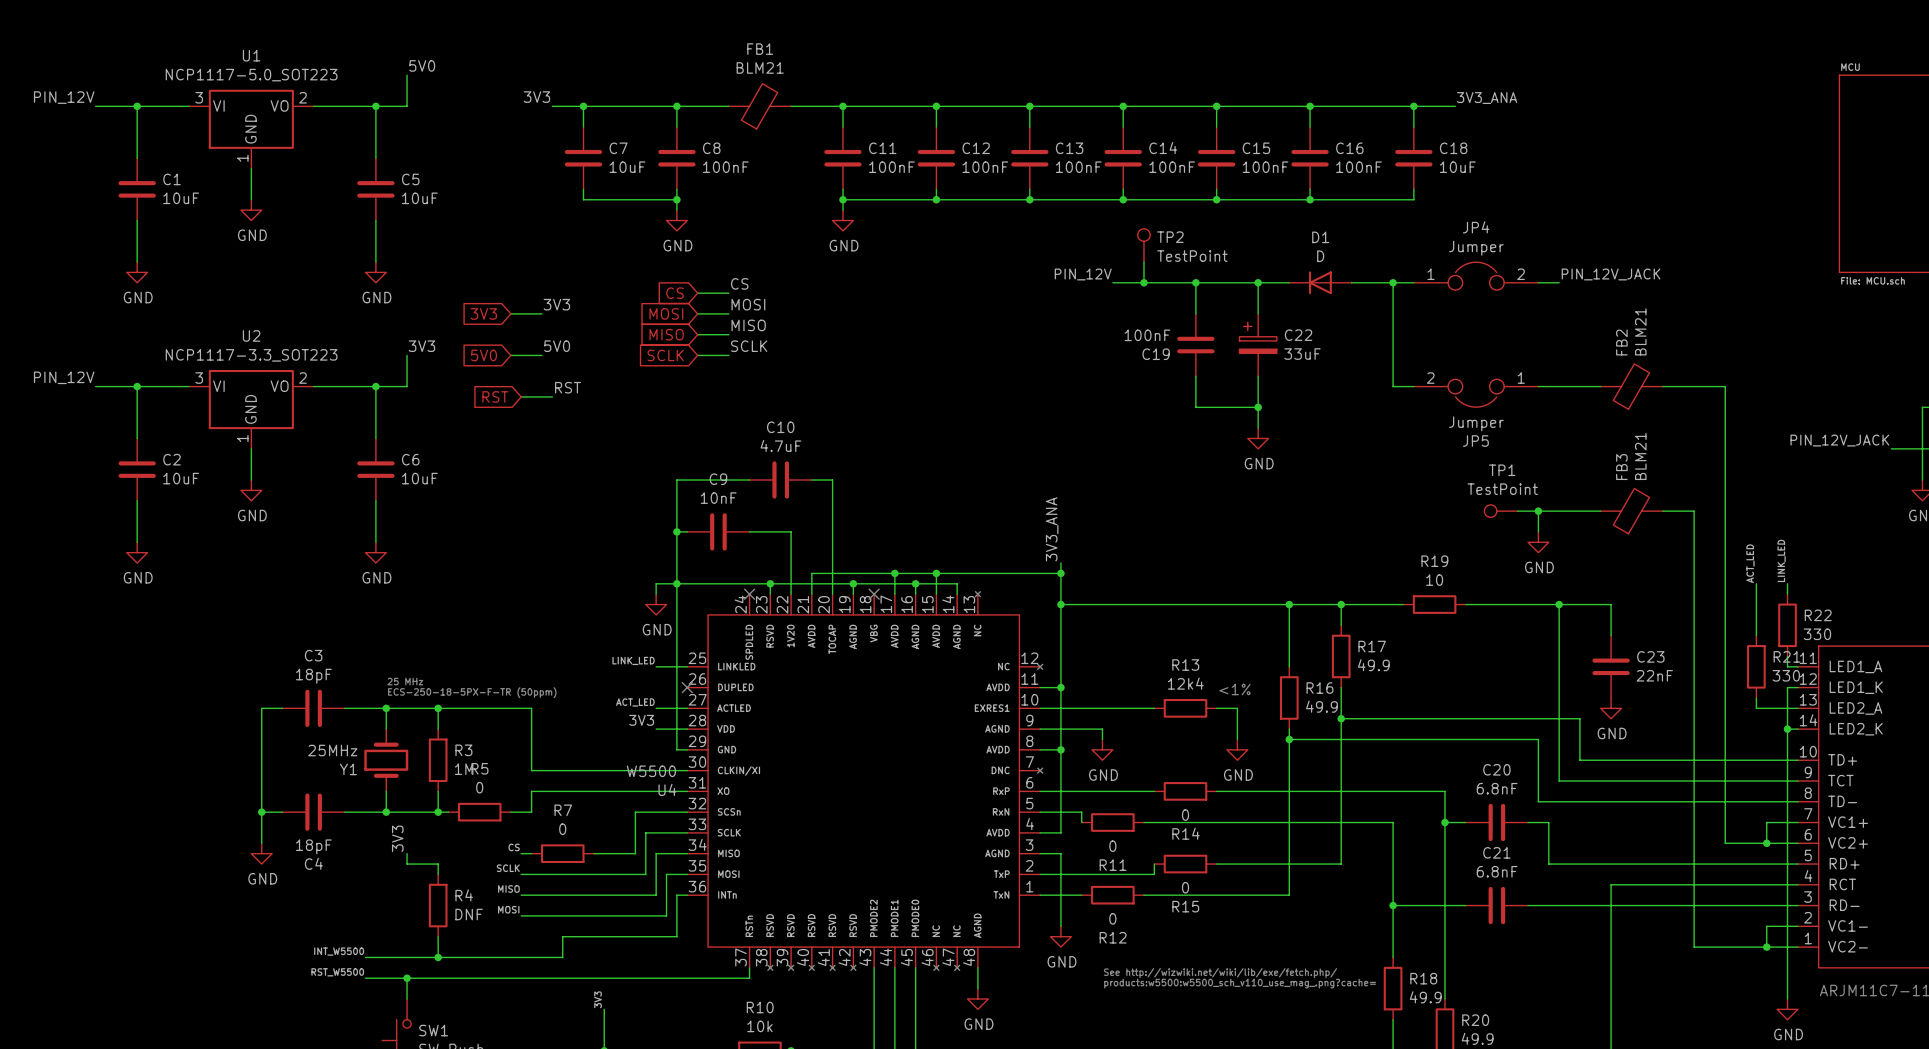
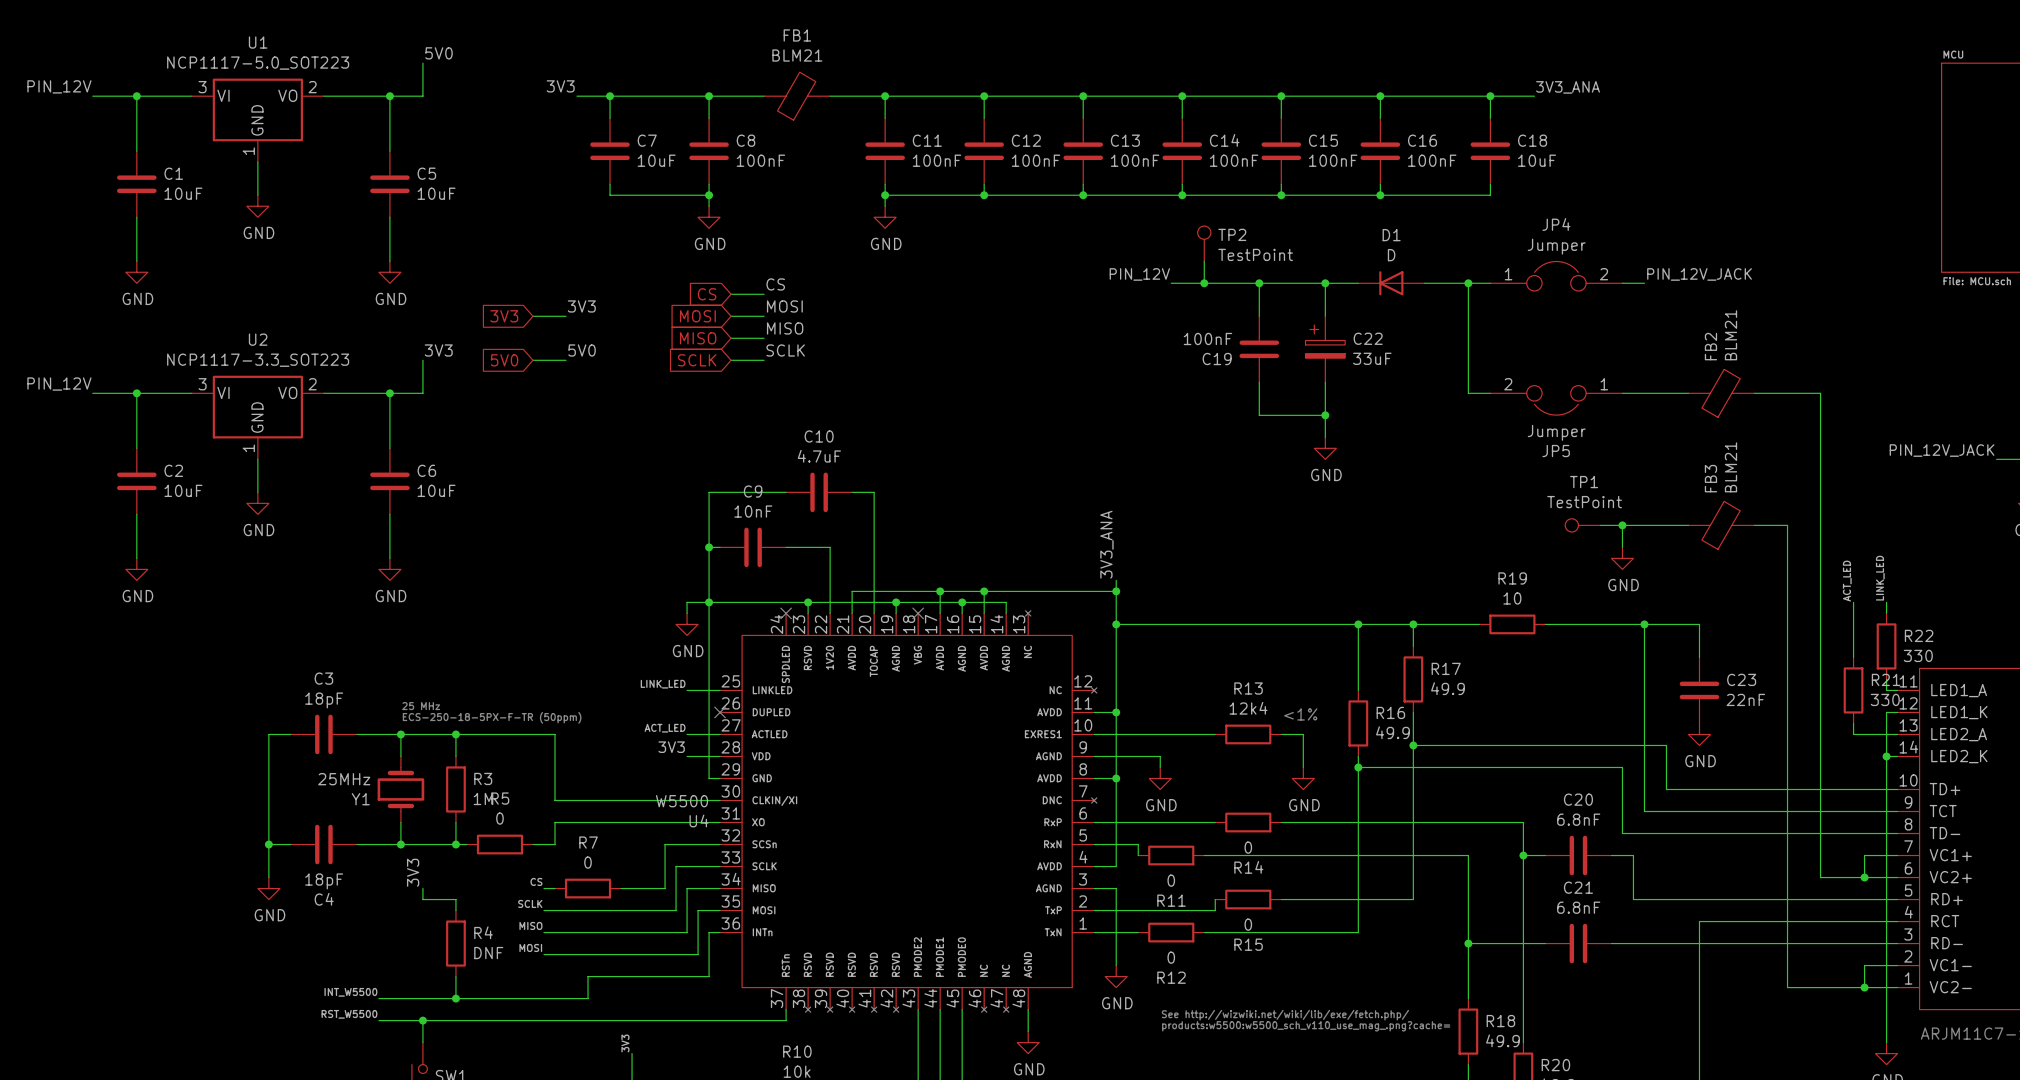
label: RST (568, 387) -> none
global label: RST (495, 396) -> none
wire: (521, 396) (552, 396) -> none

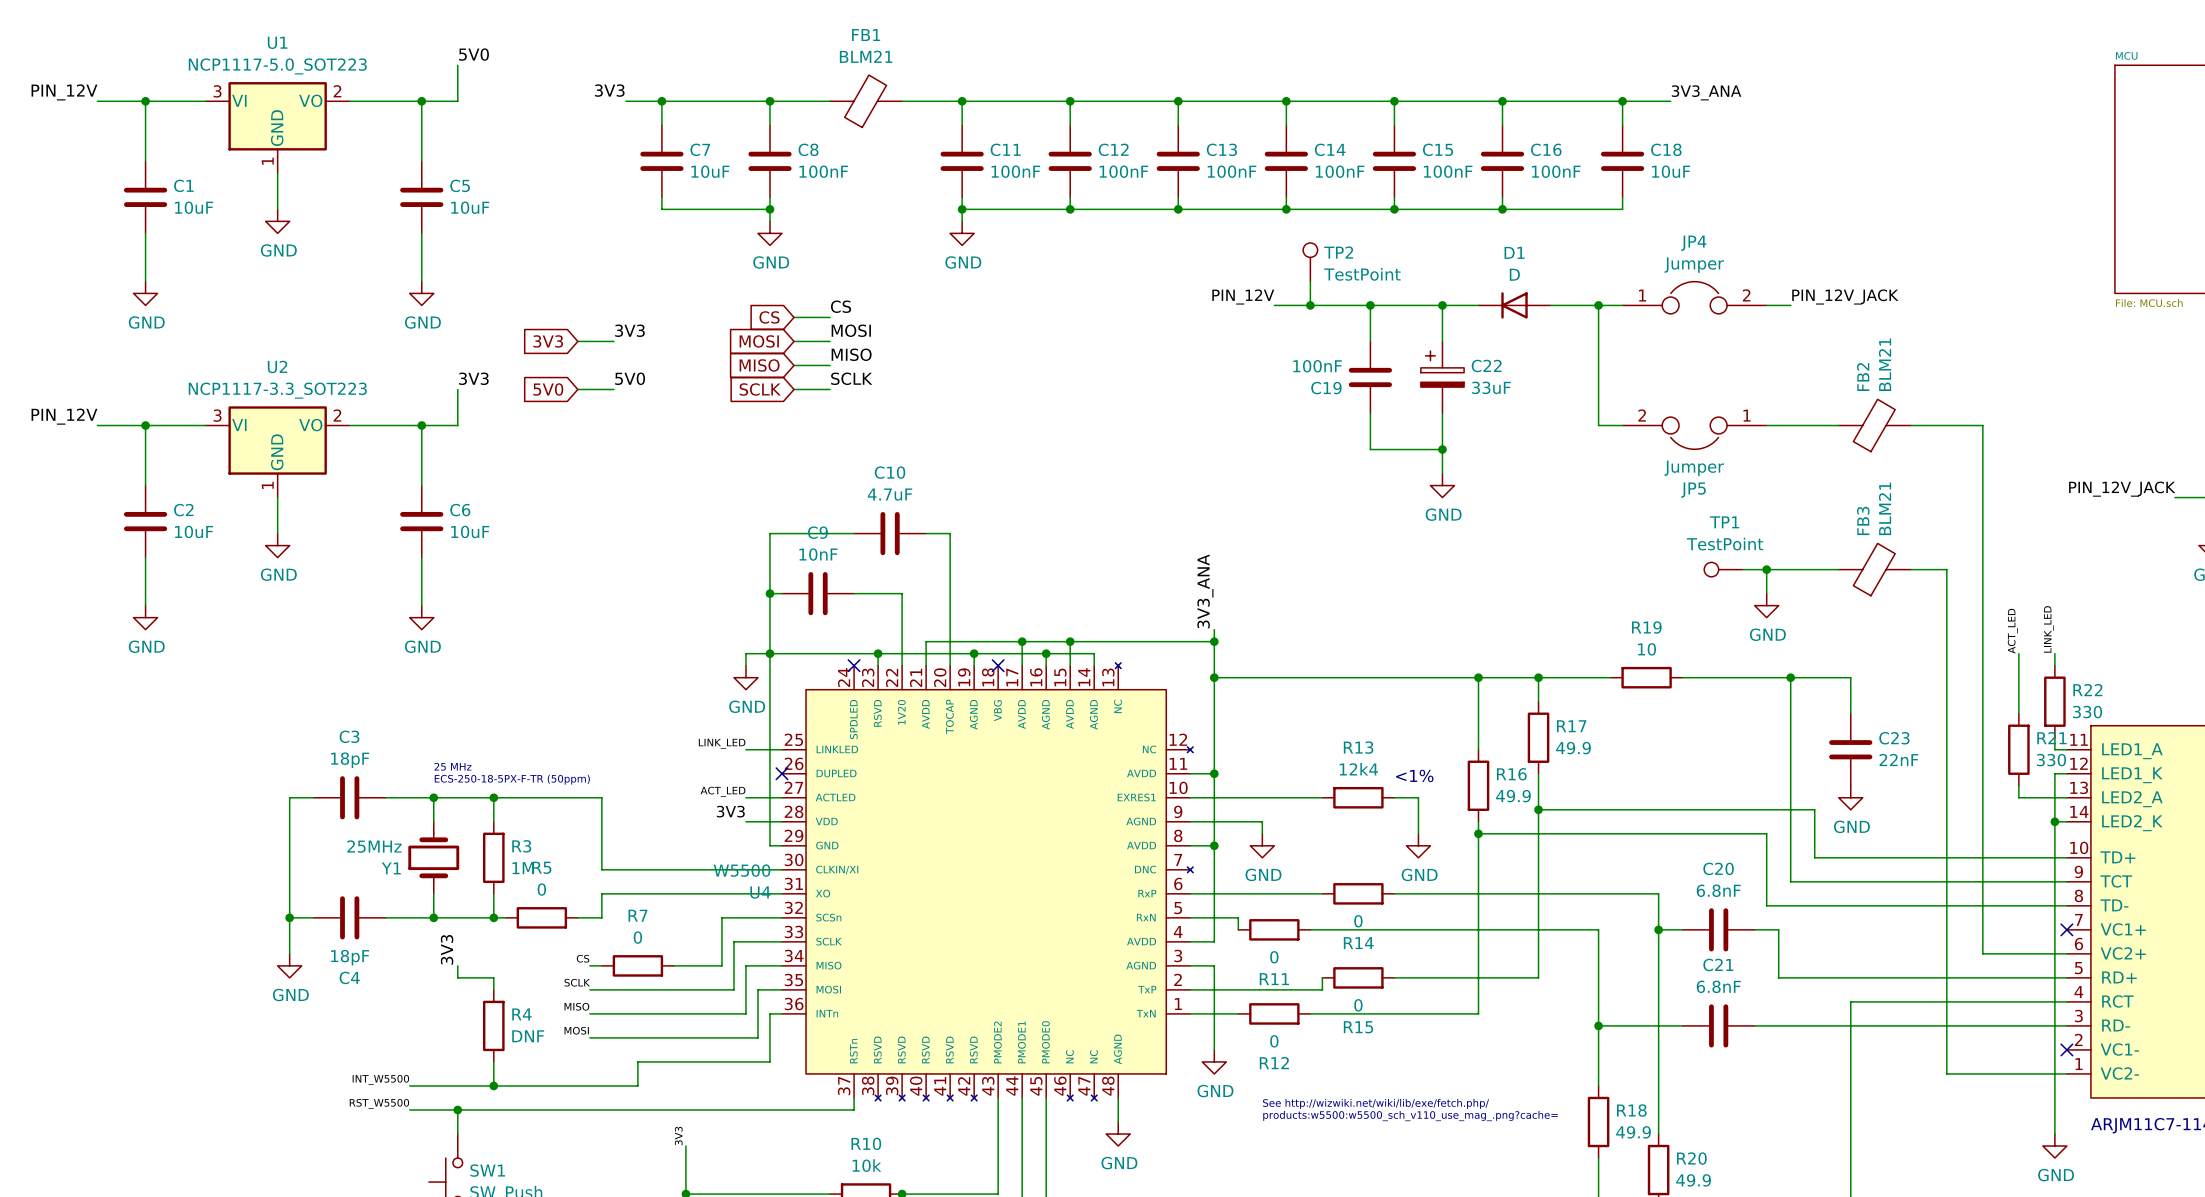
wire: (1897, 855) (1864, 855) (1864, 877) -> none
no-connect mark: none -> (2066, 929)
junction: (1864, 877) -> none
wire: (1897, 965) (1864, 965) (1864, 987) -> none
no-connect mark: none -> (2066, 1049)
junction: (1864, 987) -> none

